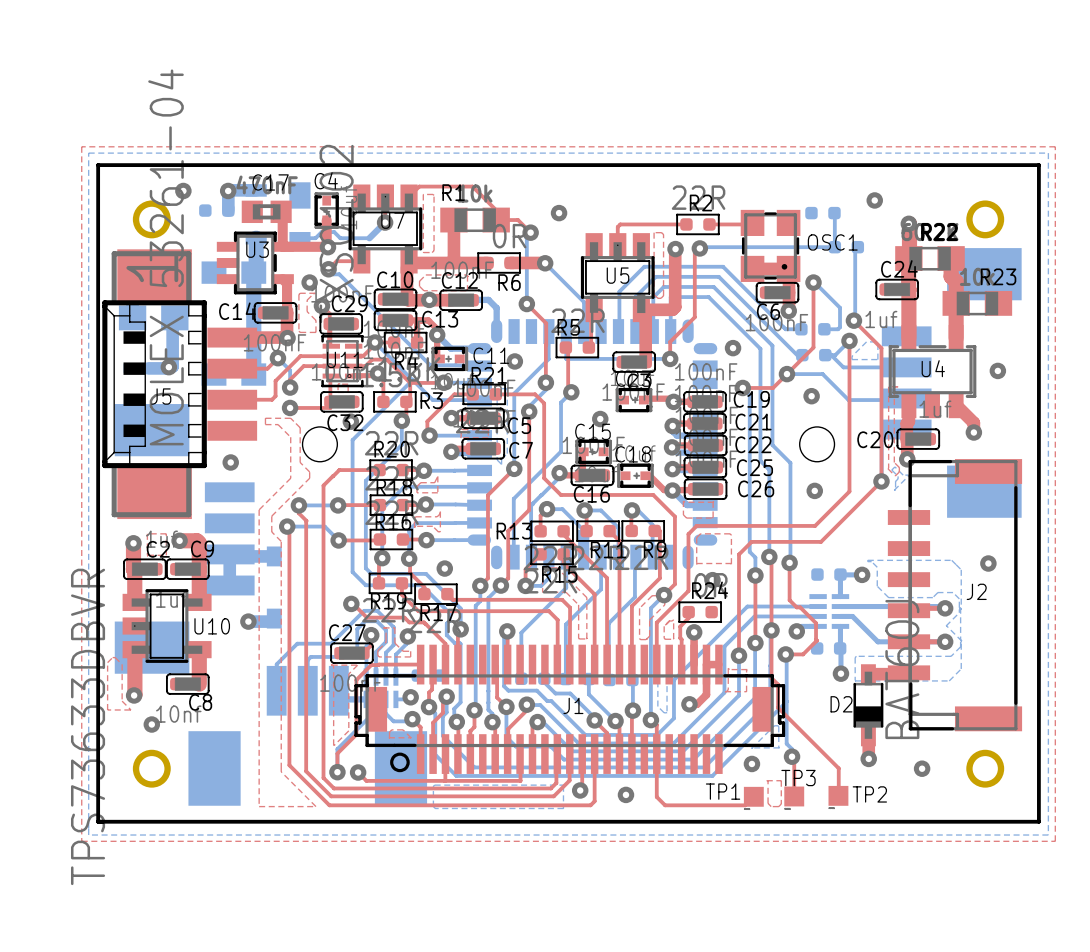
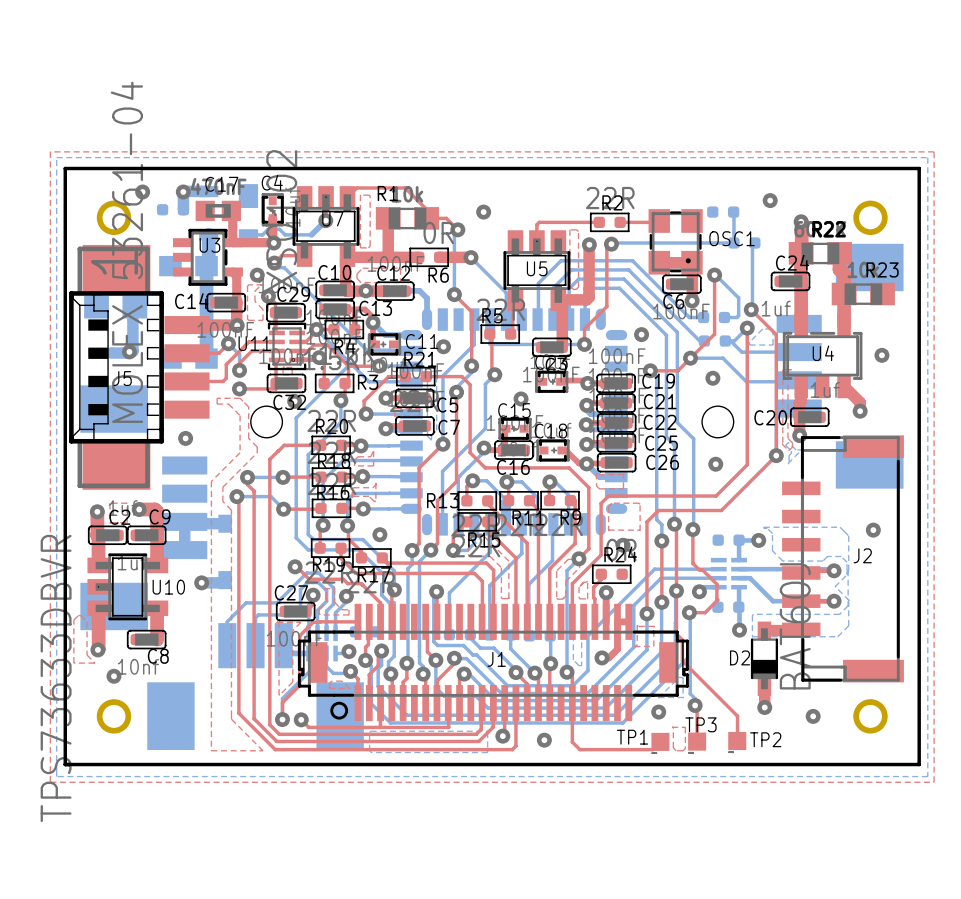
U11 name position: U11 (344, 359) -> U11 (254, 343)

